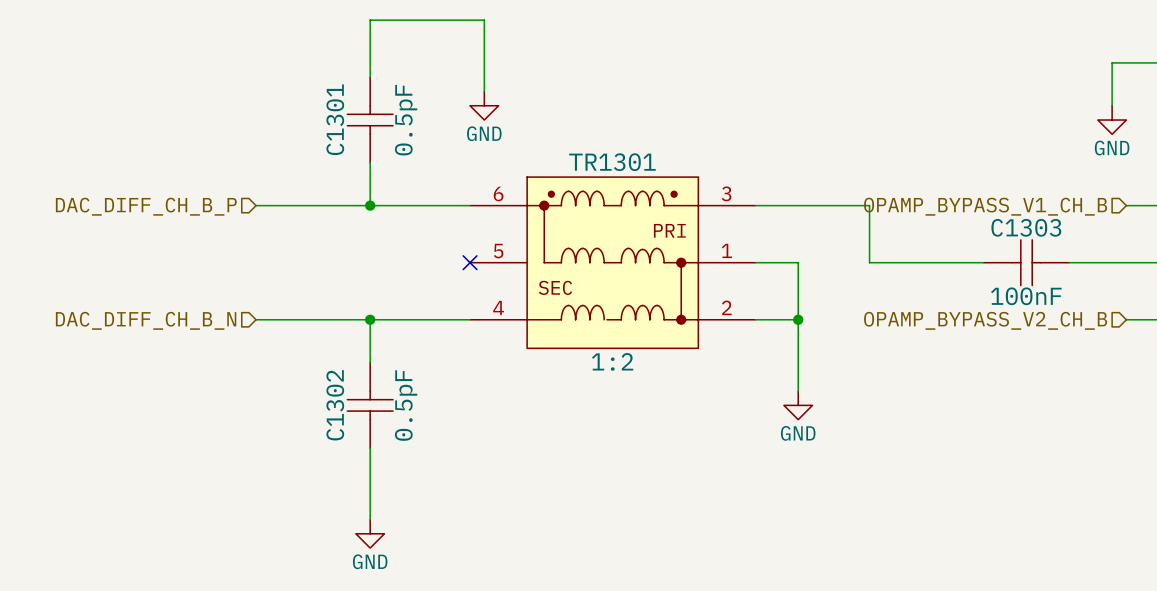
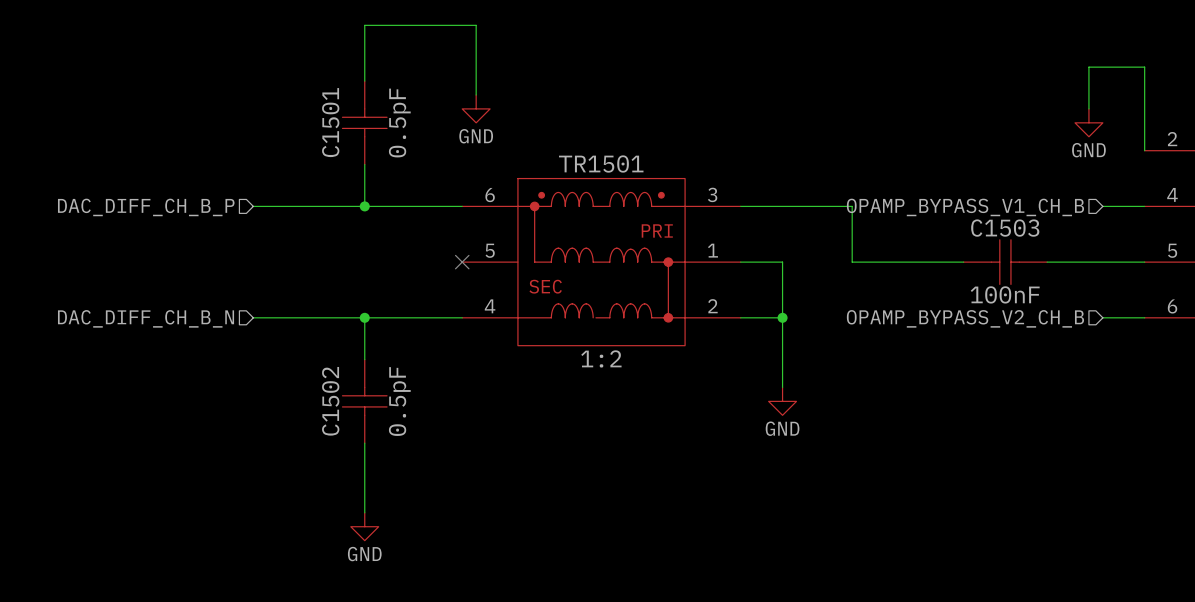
C1301 name: C1301 (335, 119) -> C1501 (330, 122)
TR1301 name: TR1301 (612, 162) -> TR1501 (601, 164)
C1303 name: C1303 (1026, 227) -> C1503 (1005, 228)
C1302 name: C1302 (335, 405) -> C1502 (330, 401)

